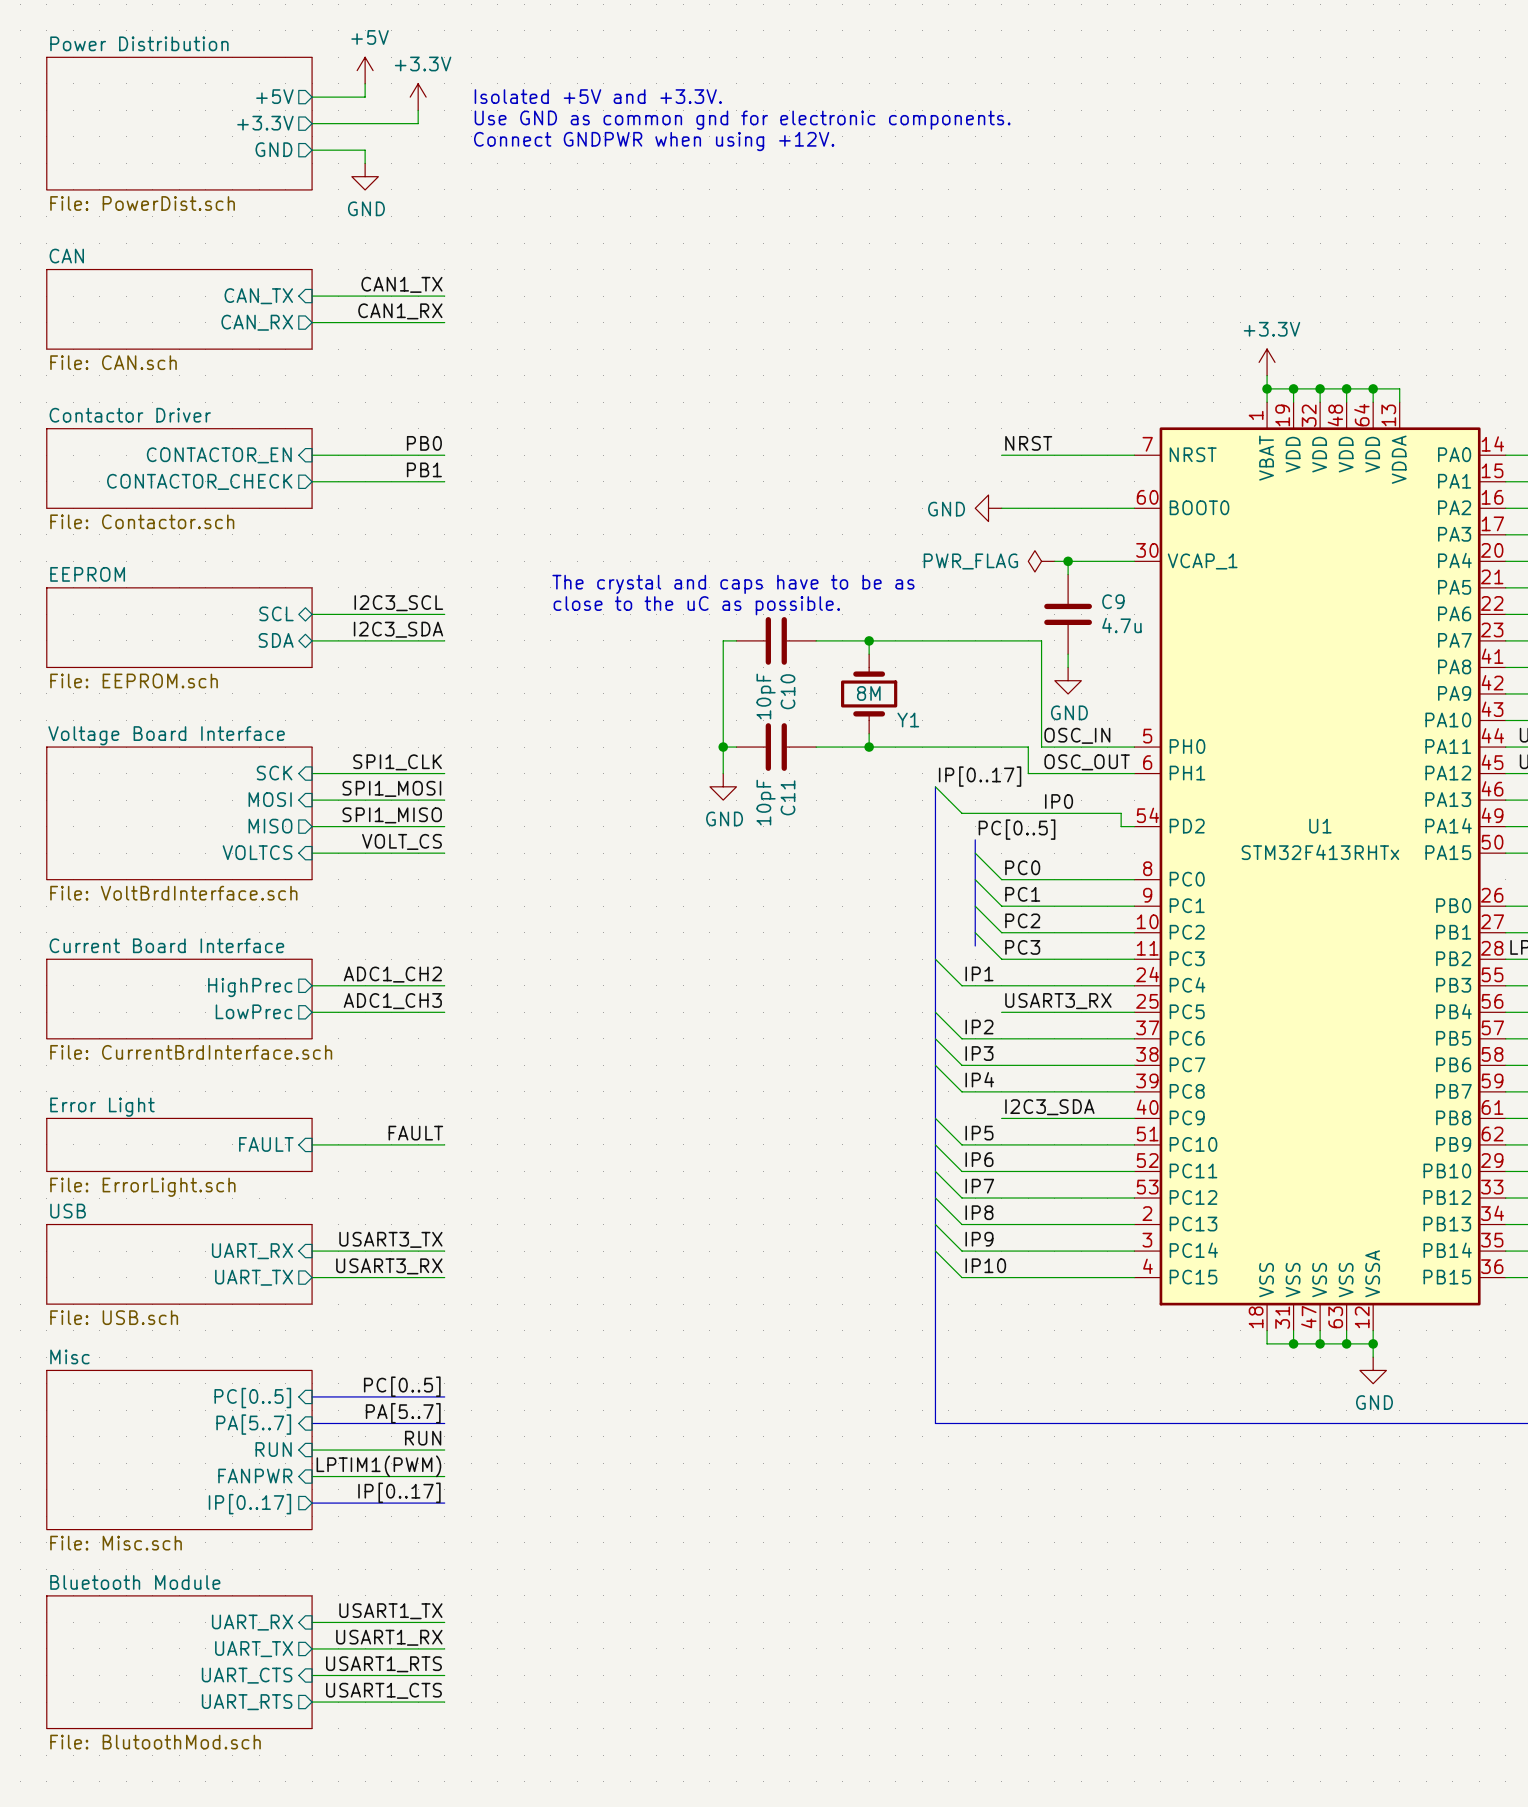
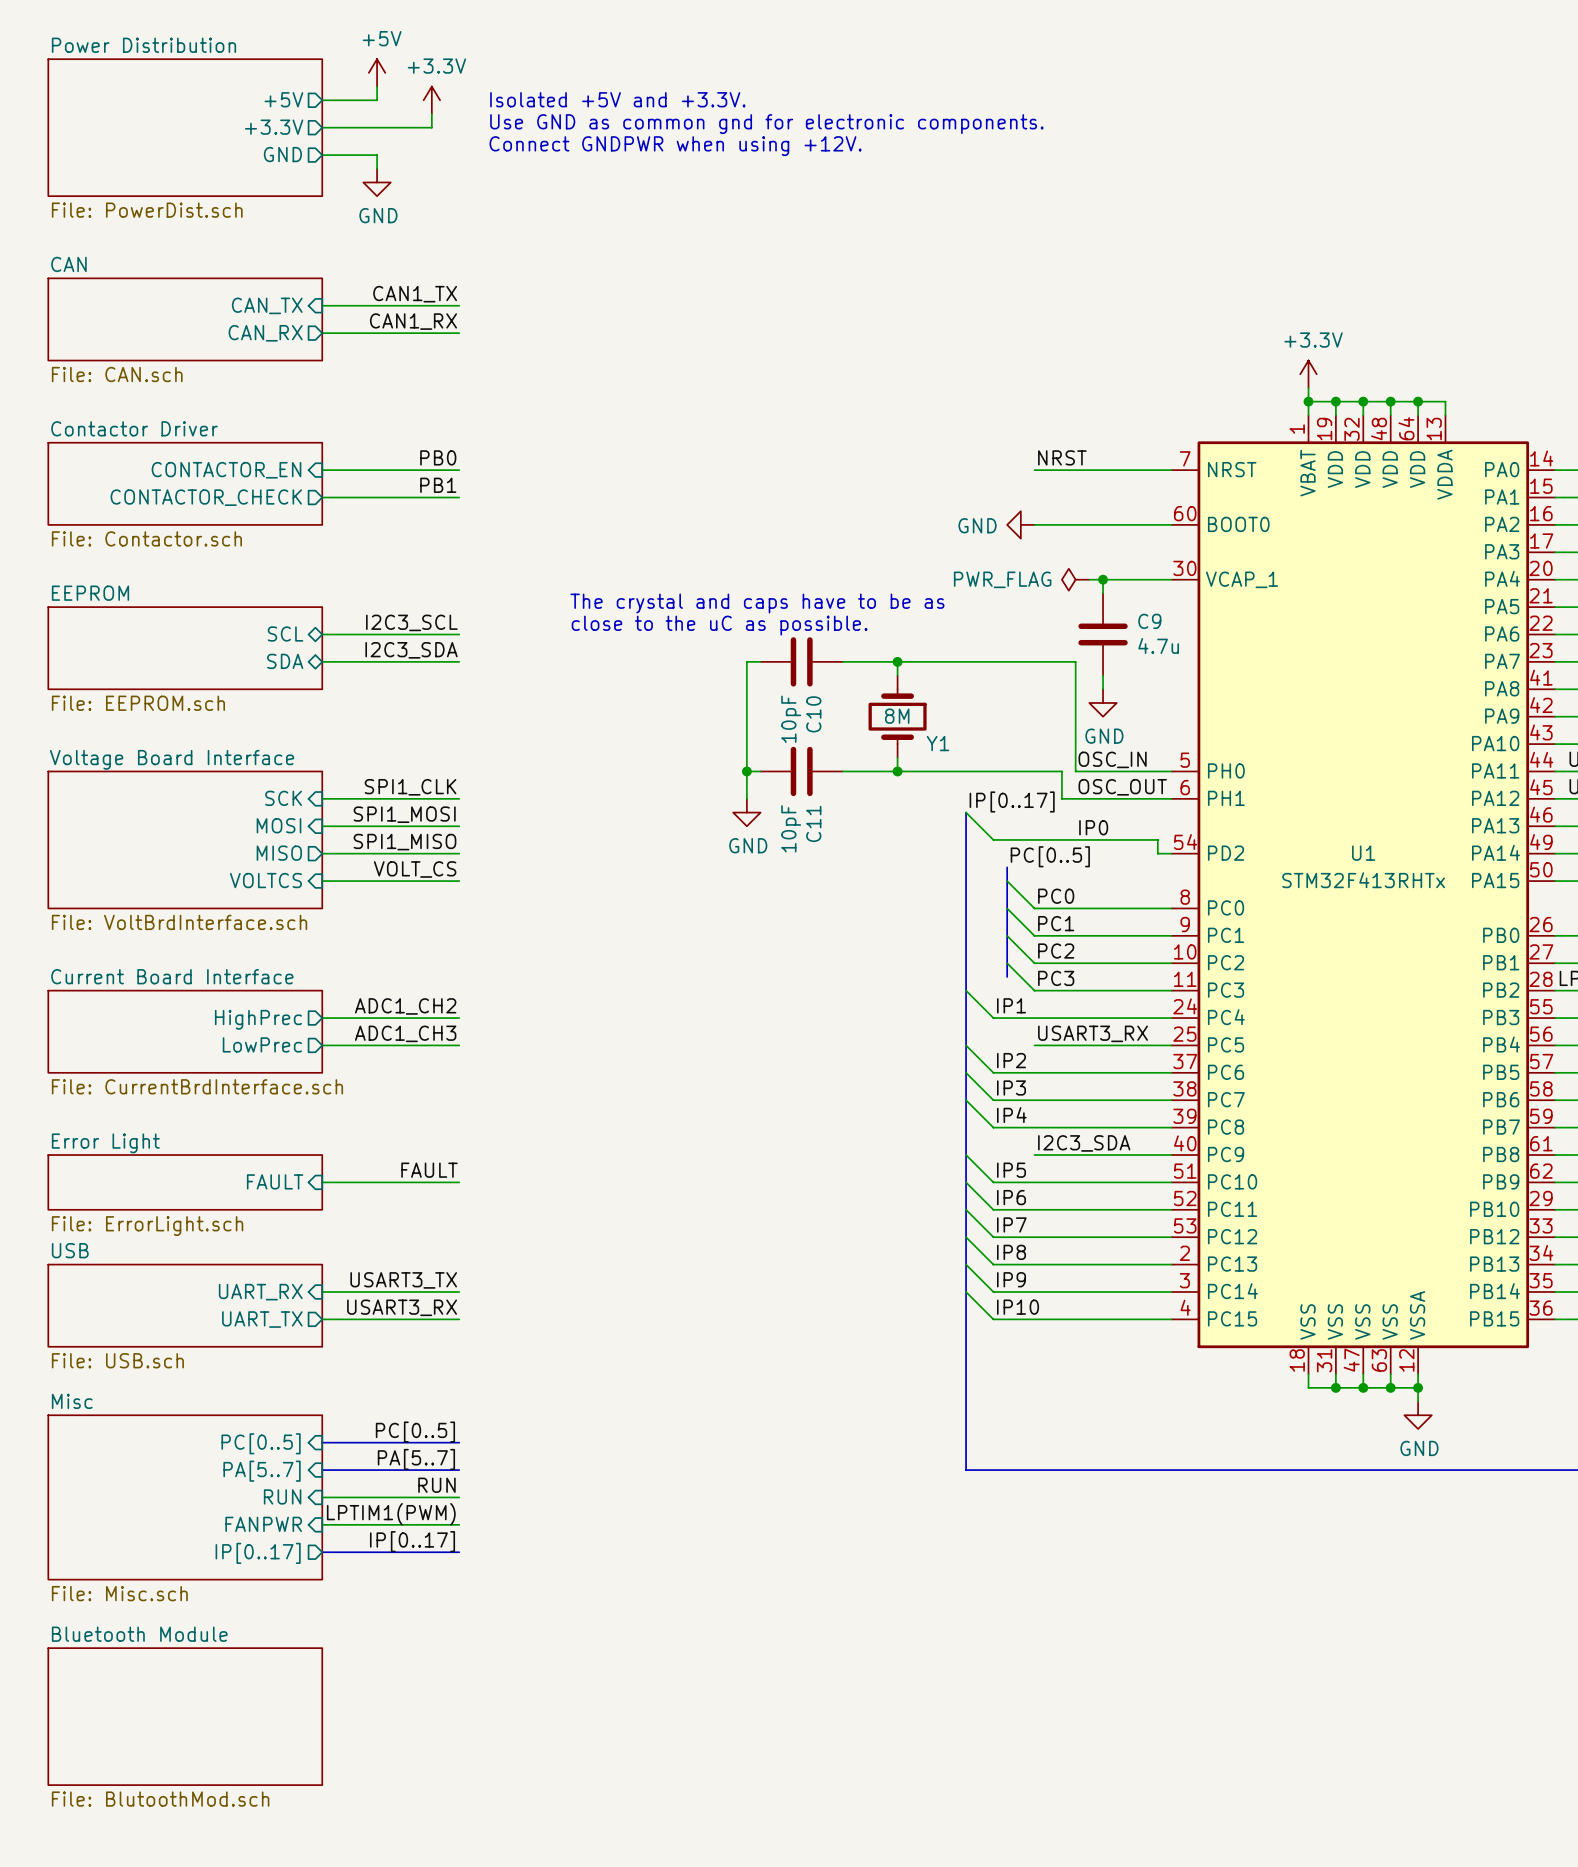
label: USART1_TX (390, 1611) -> none
sheet pin: UART_RX (252, 1622) -> none
wire: (312, 1622) (444, 1622) -> none
label: USART1_RX (389, 1637) -> none
wire: (312, 1648) (444, 1648) -> none
sheet pin: UART_TX (254, 1649) -> none
label: USART1_RTS (383, 1664) -> none
sheet pin: UART_CTS (247, 1675) -> none
wire: (312, 1675) (444, 1675) -> none
label: USART1_CTS (383, 1690) -> none
sheet pin: UART_RTS (247, 1702) -> none
wire: (312, 1702) (444, 1702) -> none

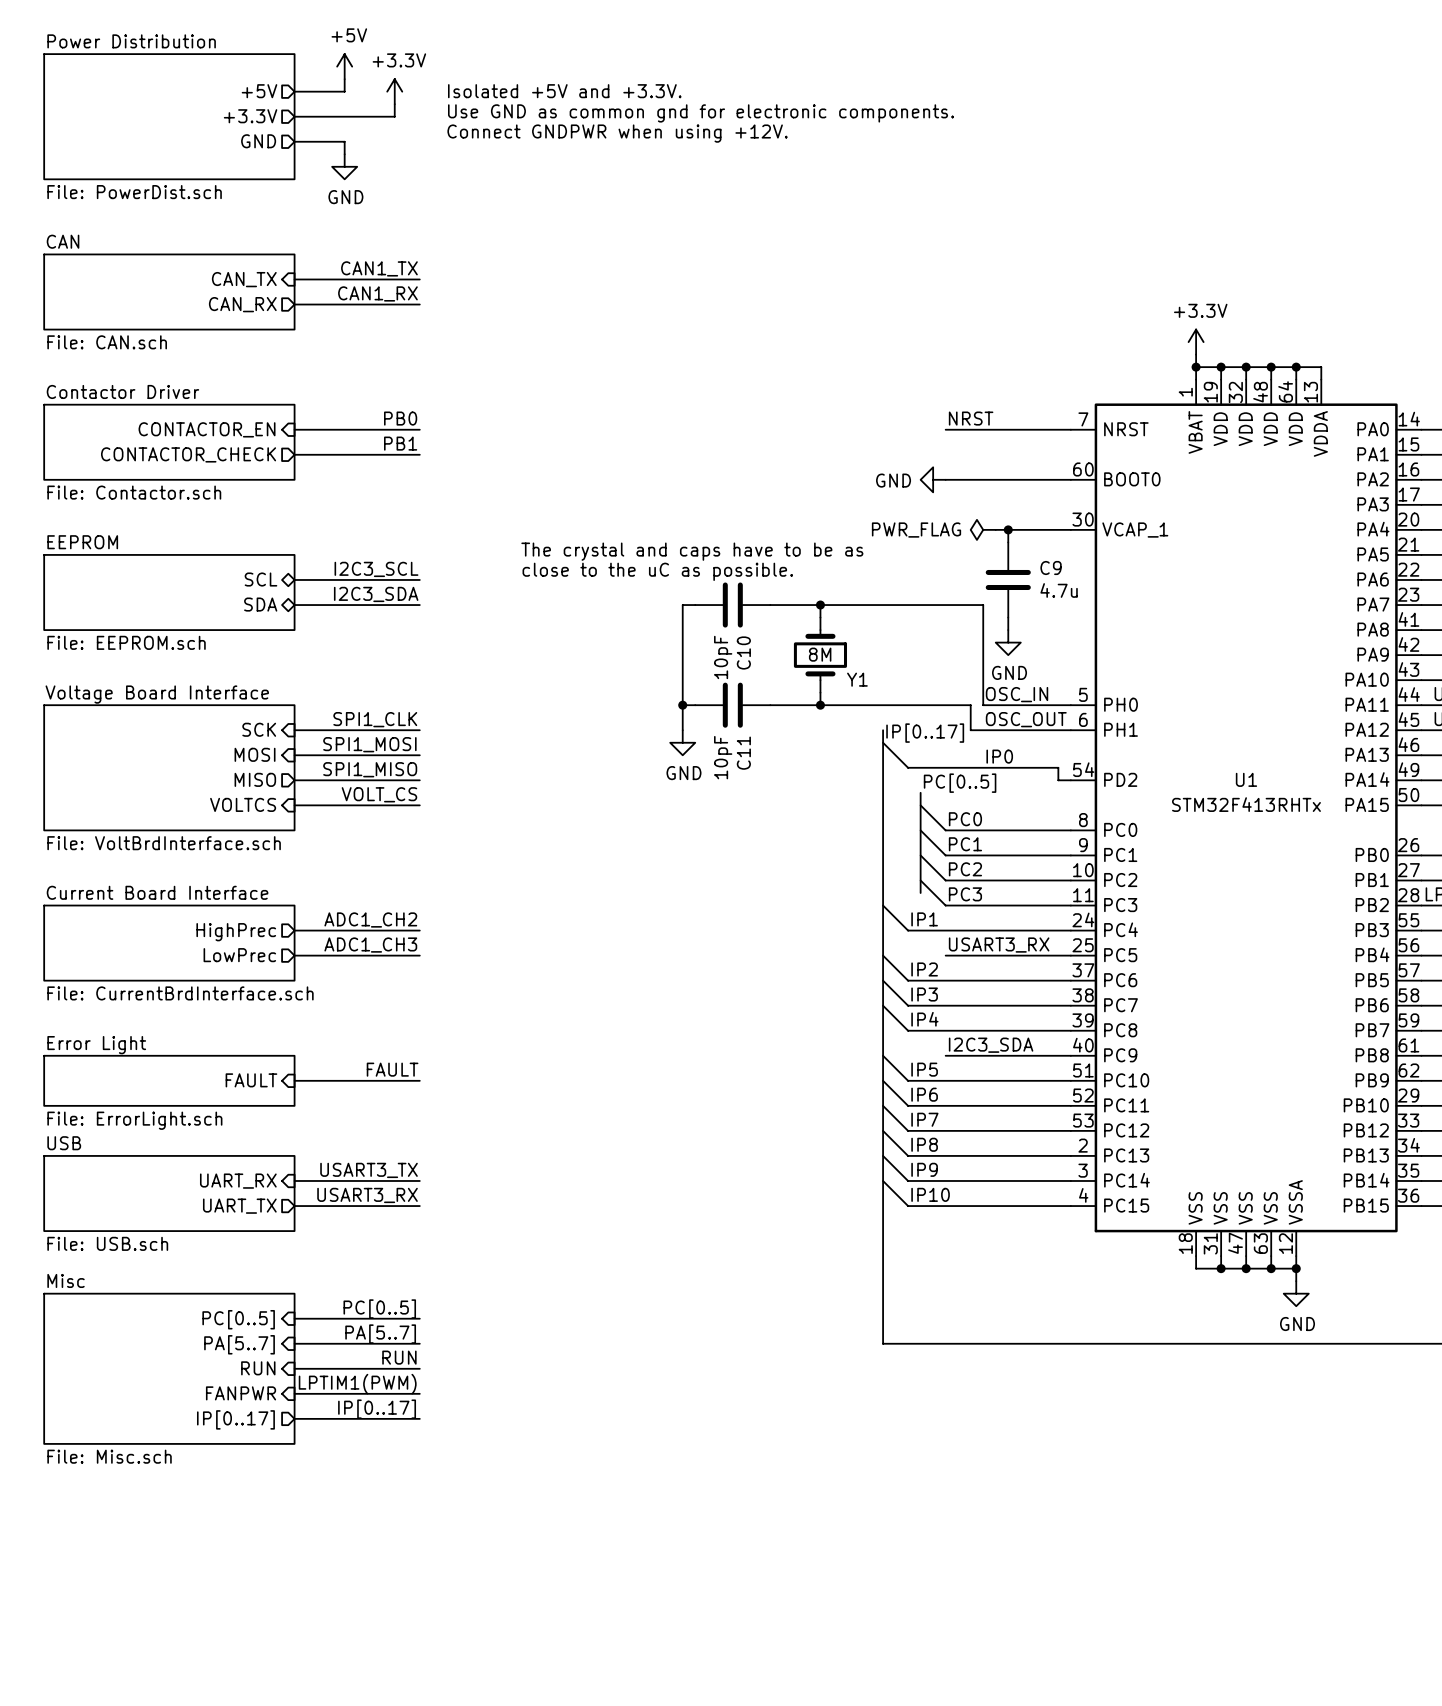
bus: none -> (883, 730) (883, 742)
sheet Bluetooth Module: File: BlutoothMod.sch (185, 1716) -> none

